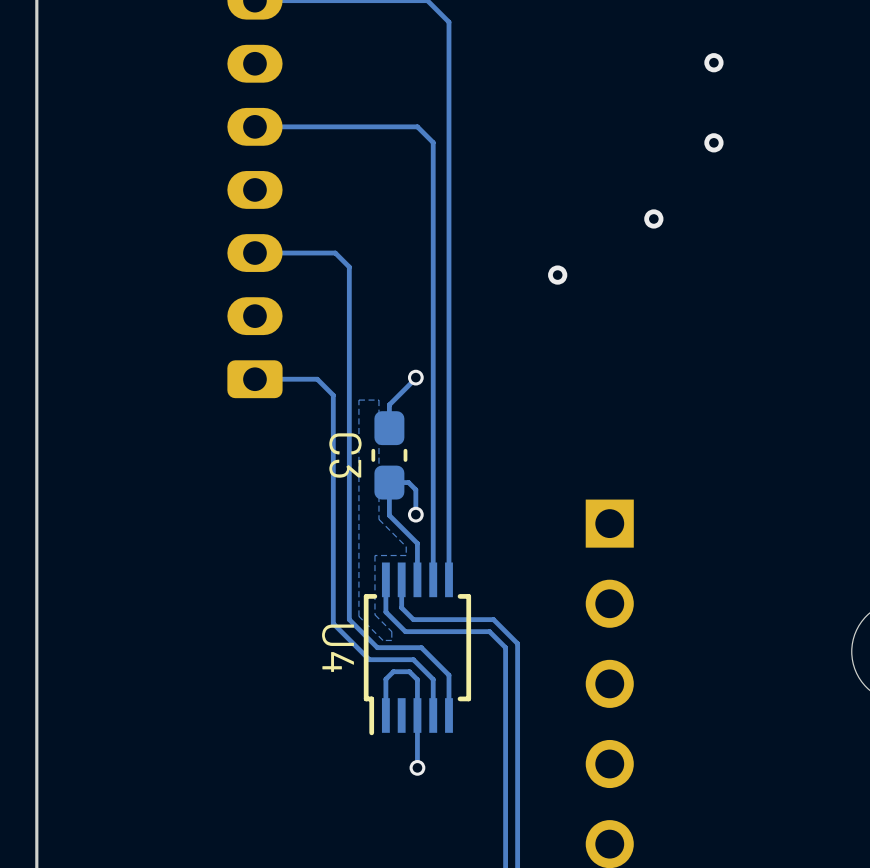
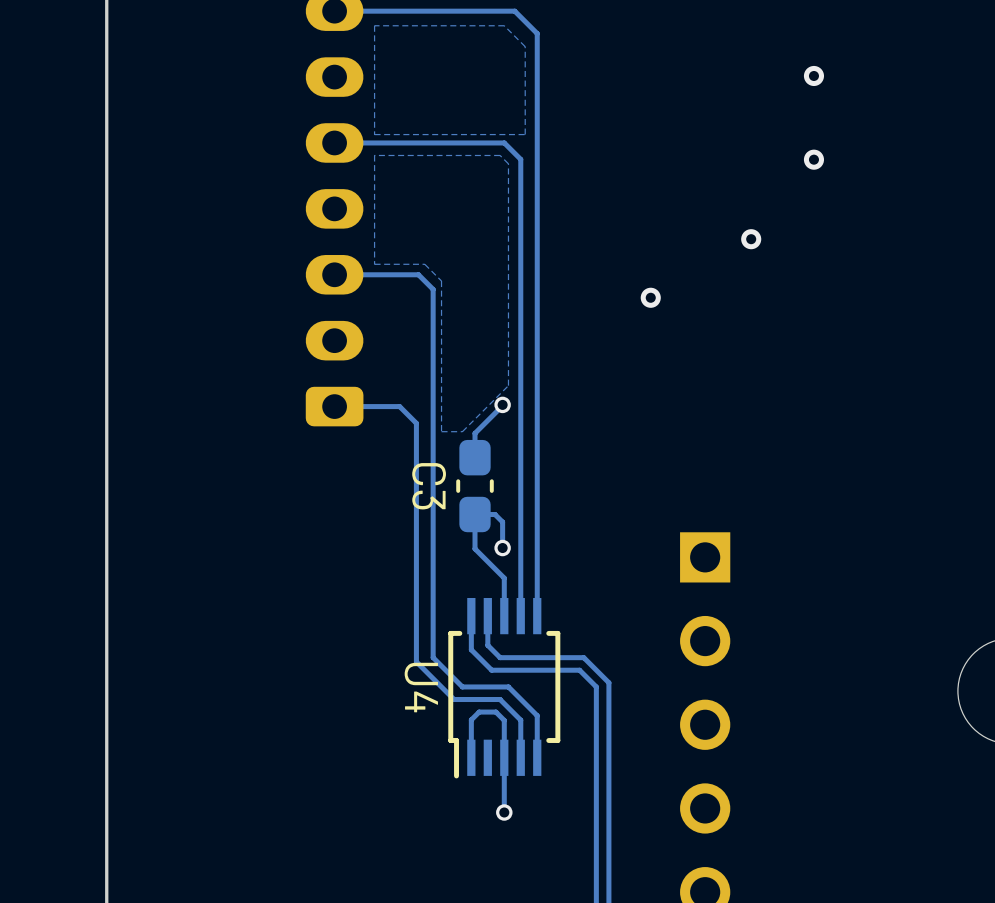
zone outline: none -> (504, 25) (525, 46) (525, 134) (374, 134) (374, 25) (504, 25)
zone outline: none -> (500, 155) (508, 163) (508, 385) (462, 431) (441, 431) (441, 281) (424, 264) (374, 264) (374, 155) (500, 155)
zone outline: (378, 400) (378, 519) (406, 546) (406, 555) (374, 555) (374, 614) (391, 631) (391, 640) (382, 640) (358, 616) (358, 400) (378, 400) -> none

